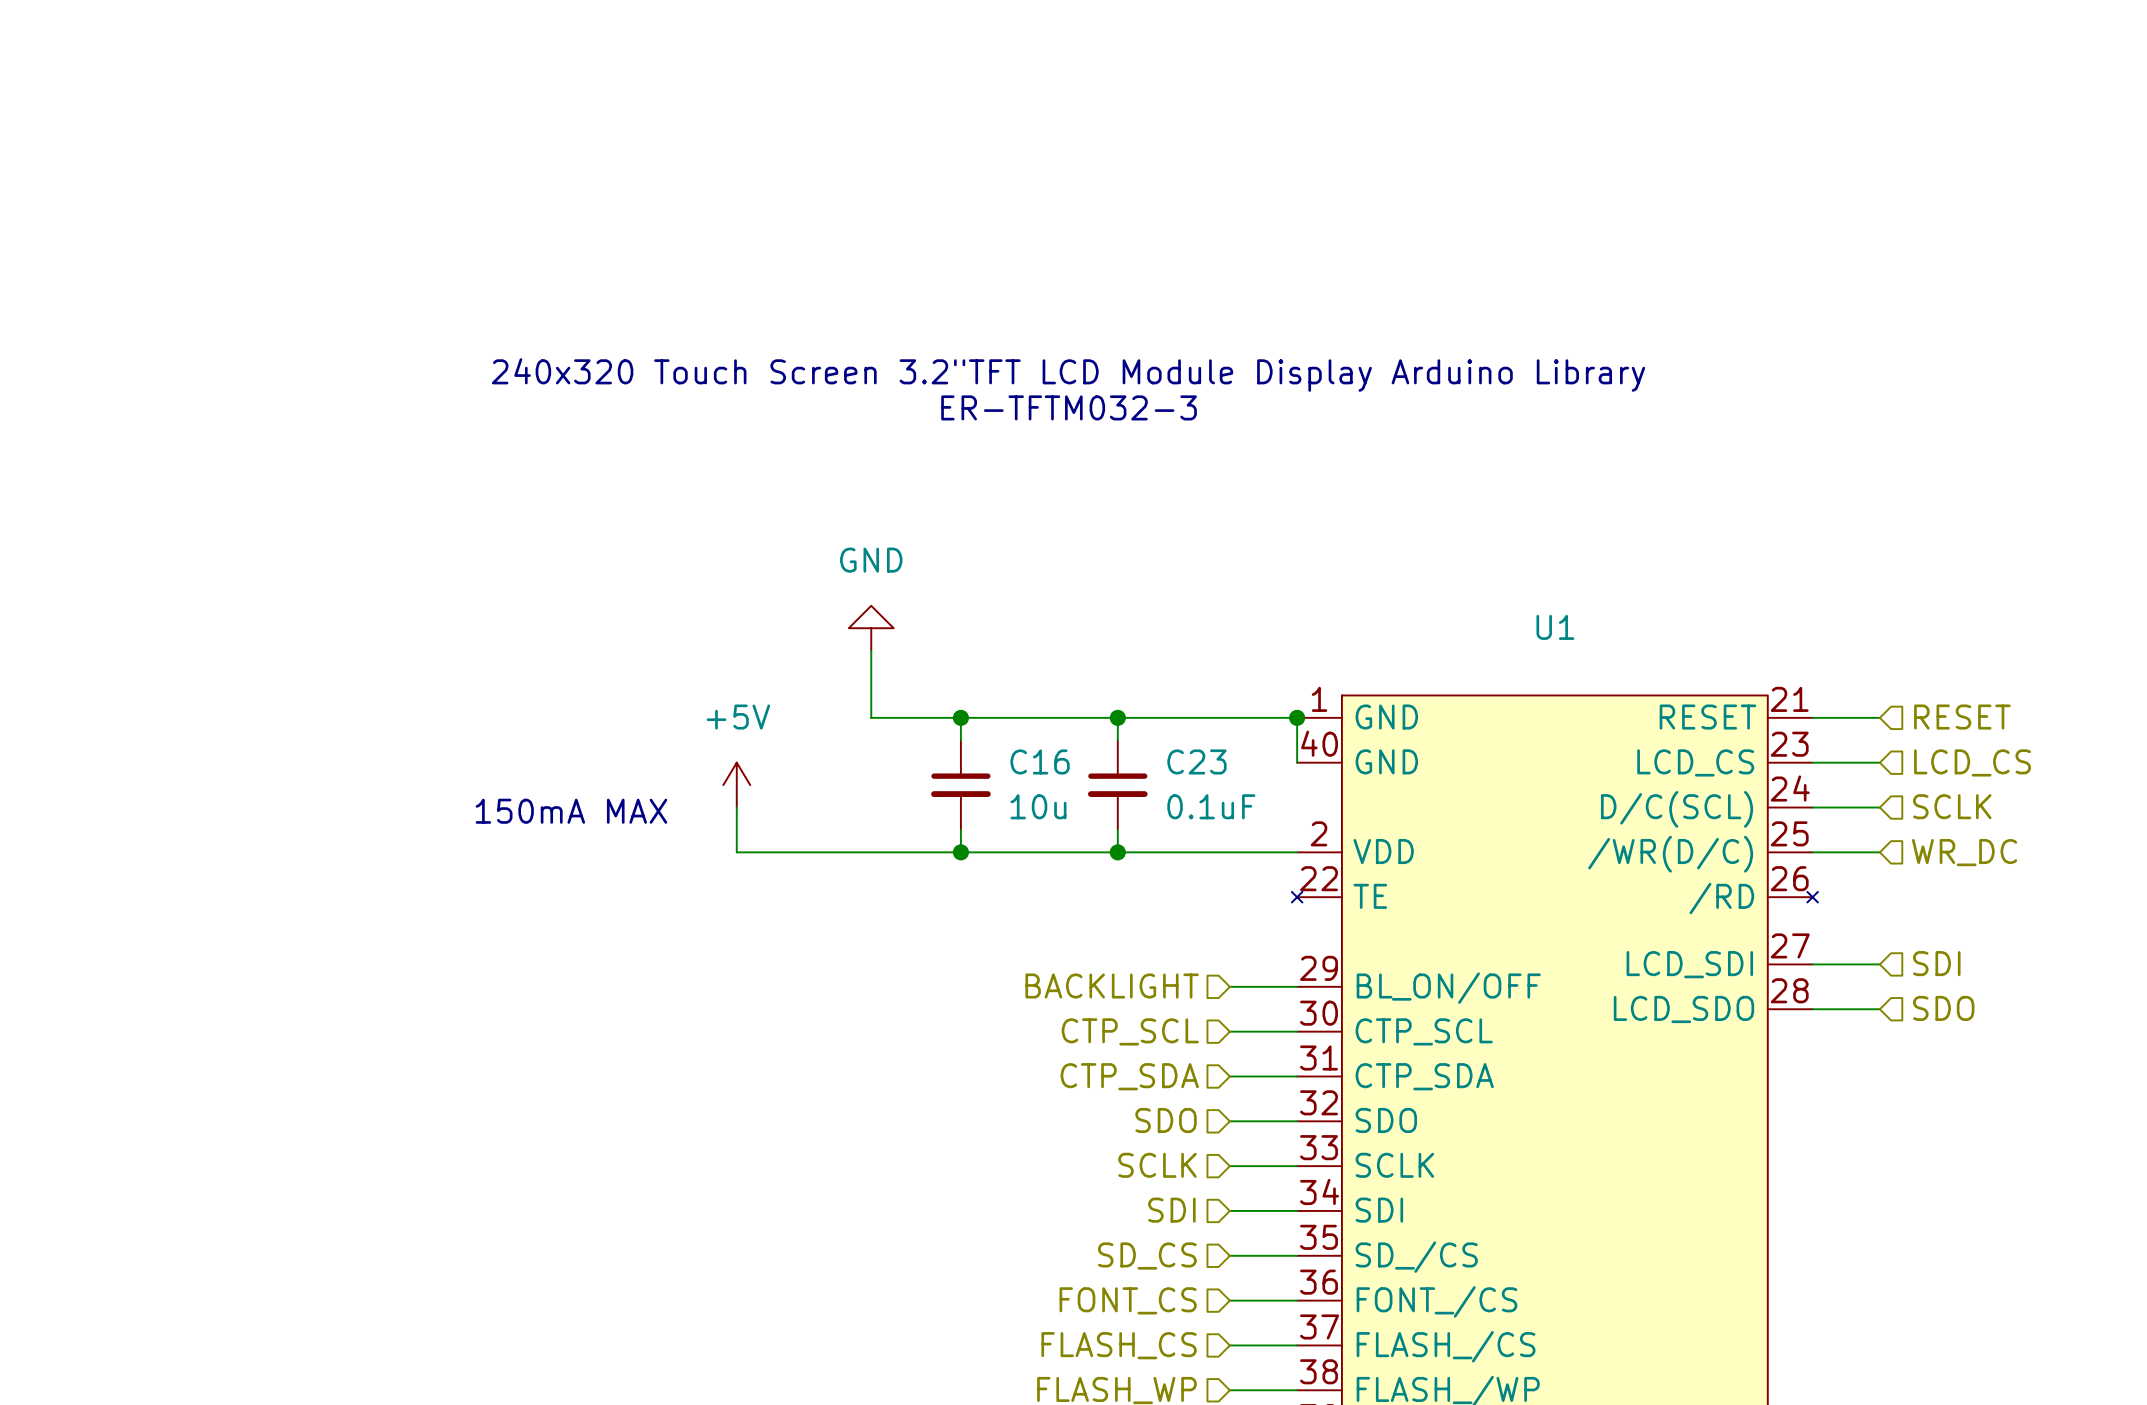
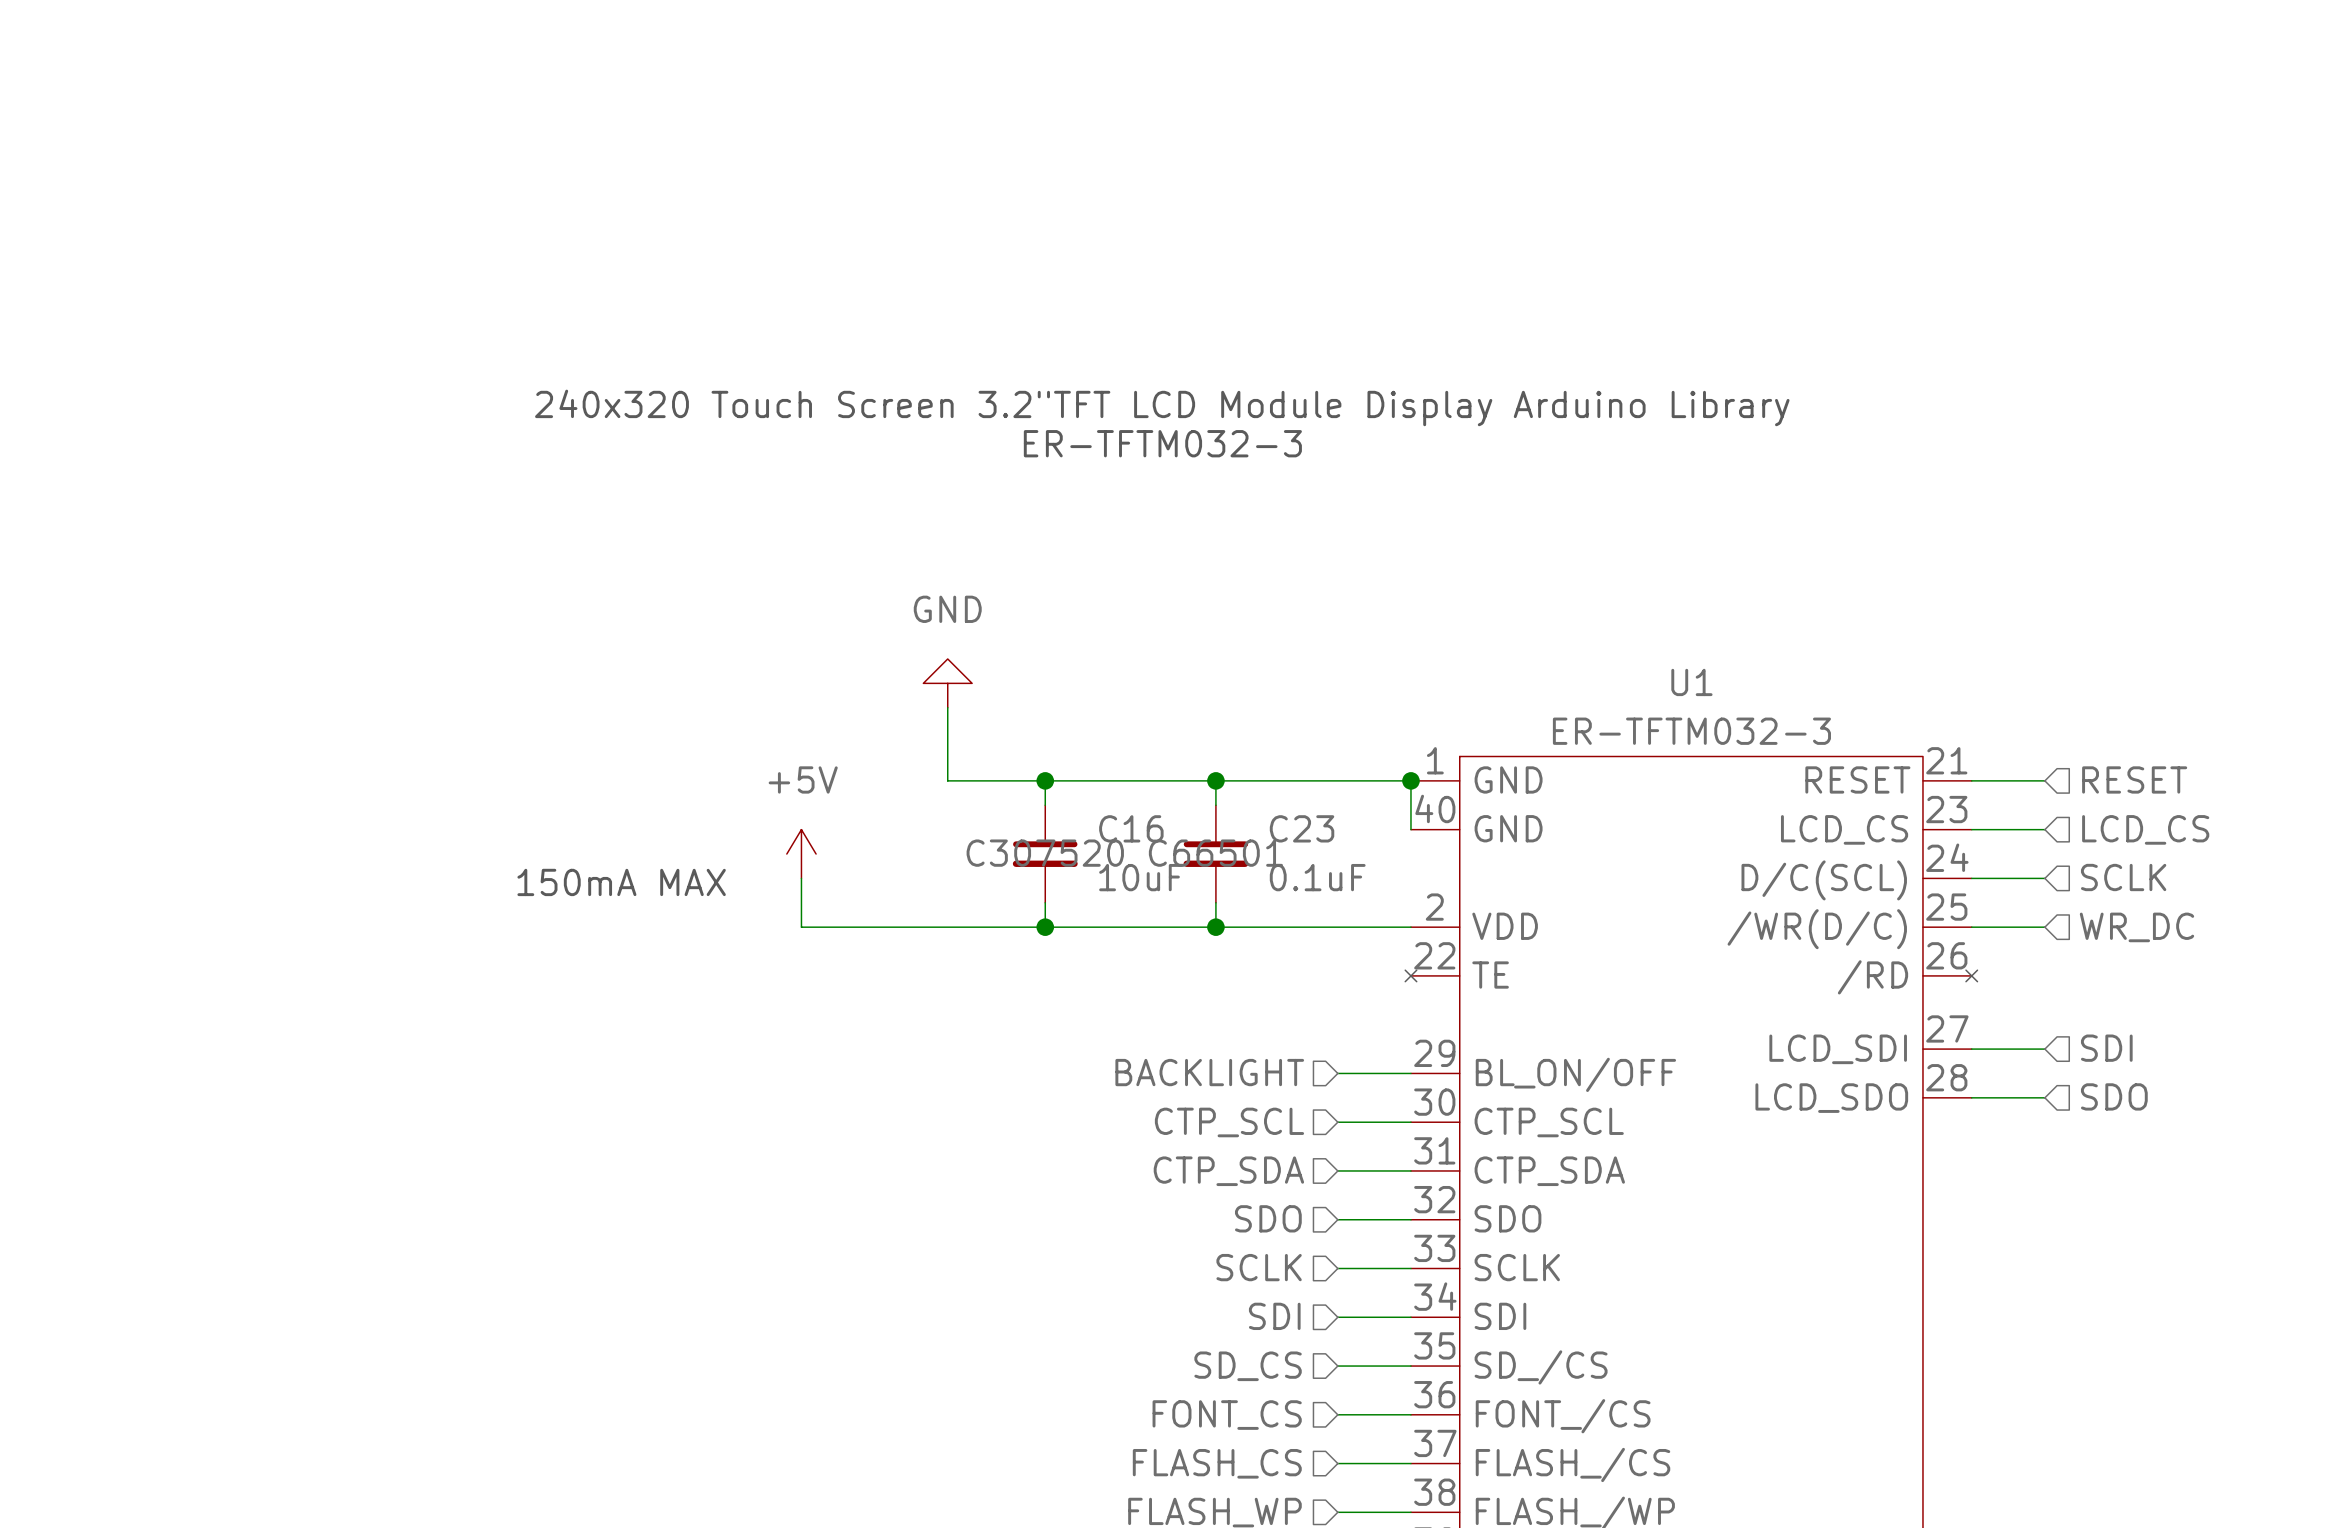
U1 value: none -> ER-TFTM032-3 (1691, 731)
C16 text: none -> C307520 (1045, 853)
C23 text: none -> C66501 (1215, 853)
C16 value: 10u (1038, 806) -> 10uF (1141, 877)

